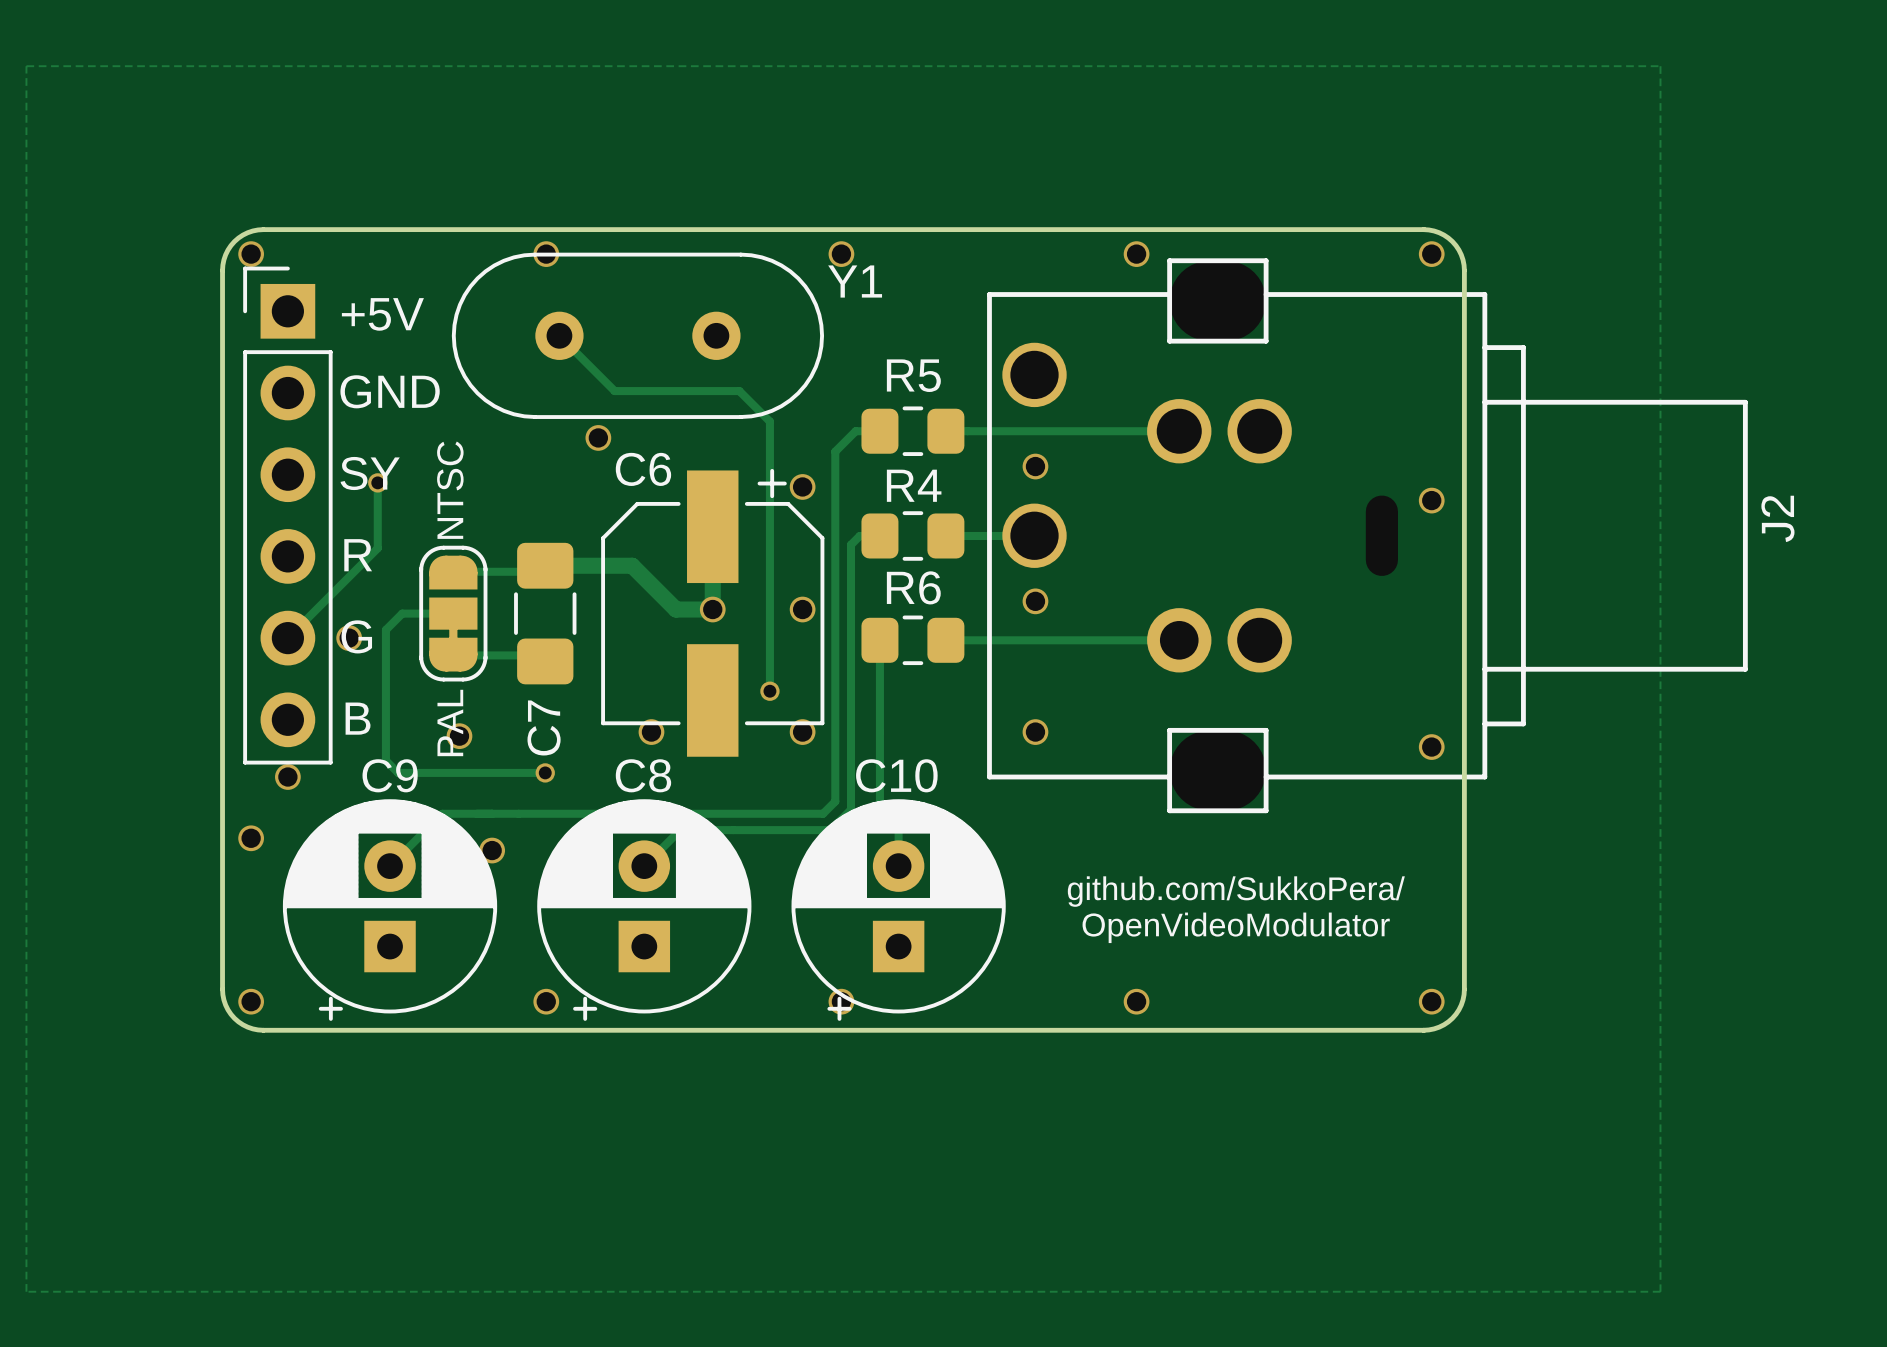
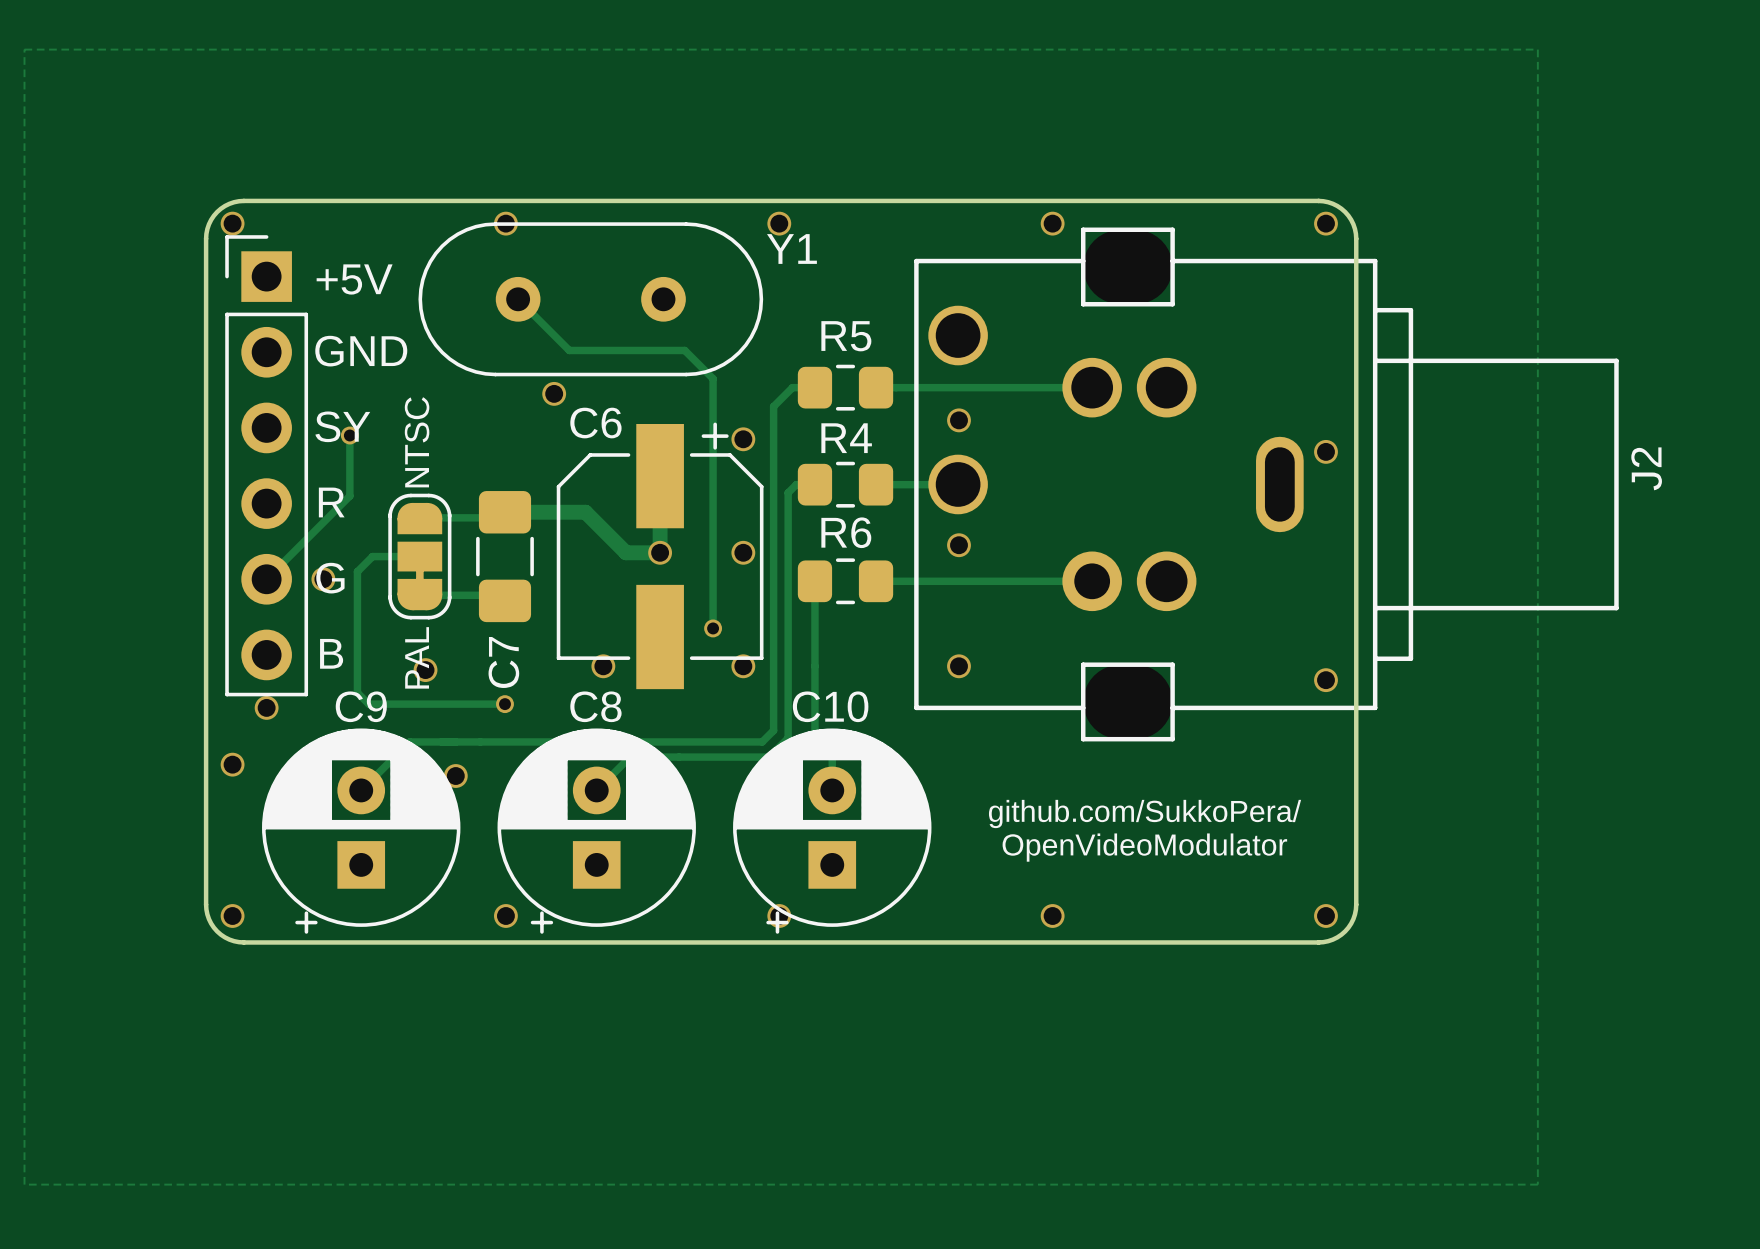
J2 footprint: [987, 258, 1748, 814] -> [914, 227, 1619, 742]

